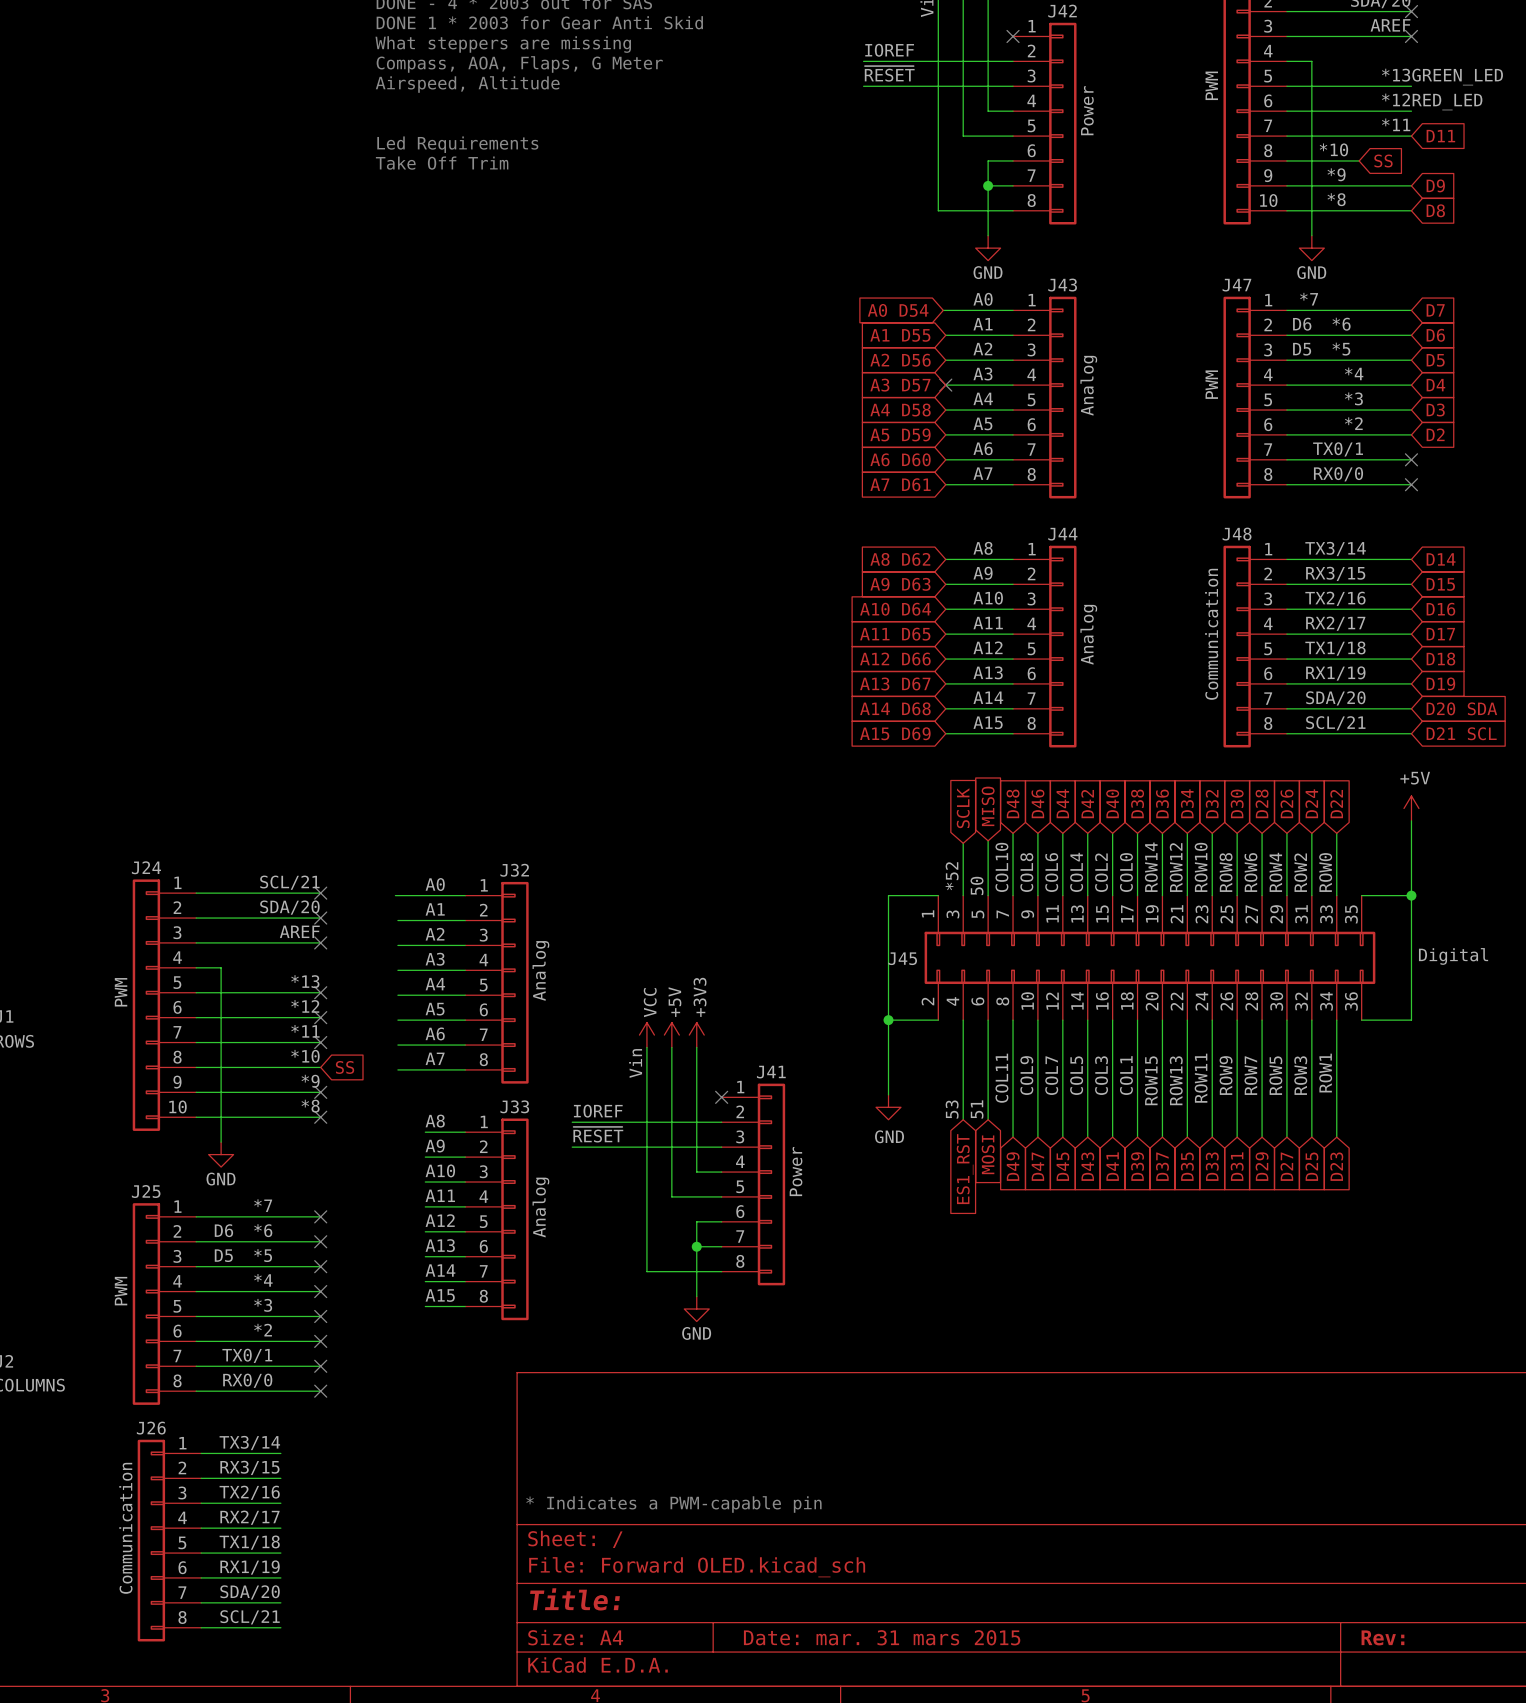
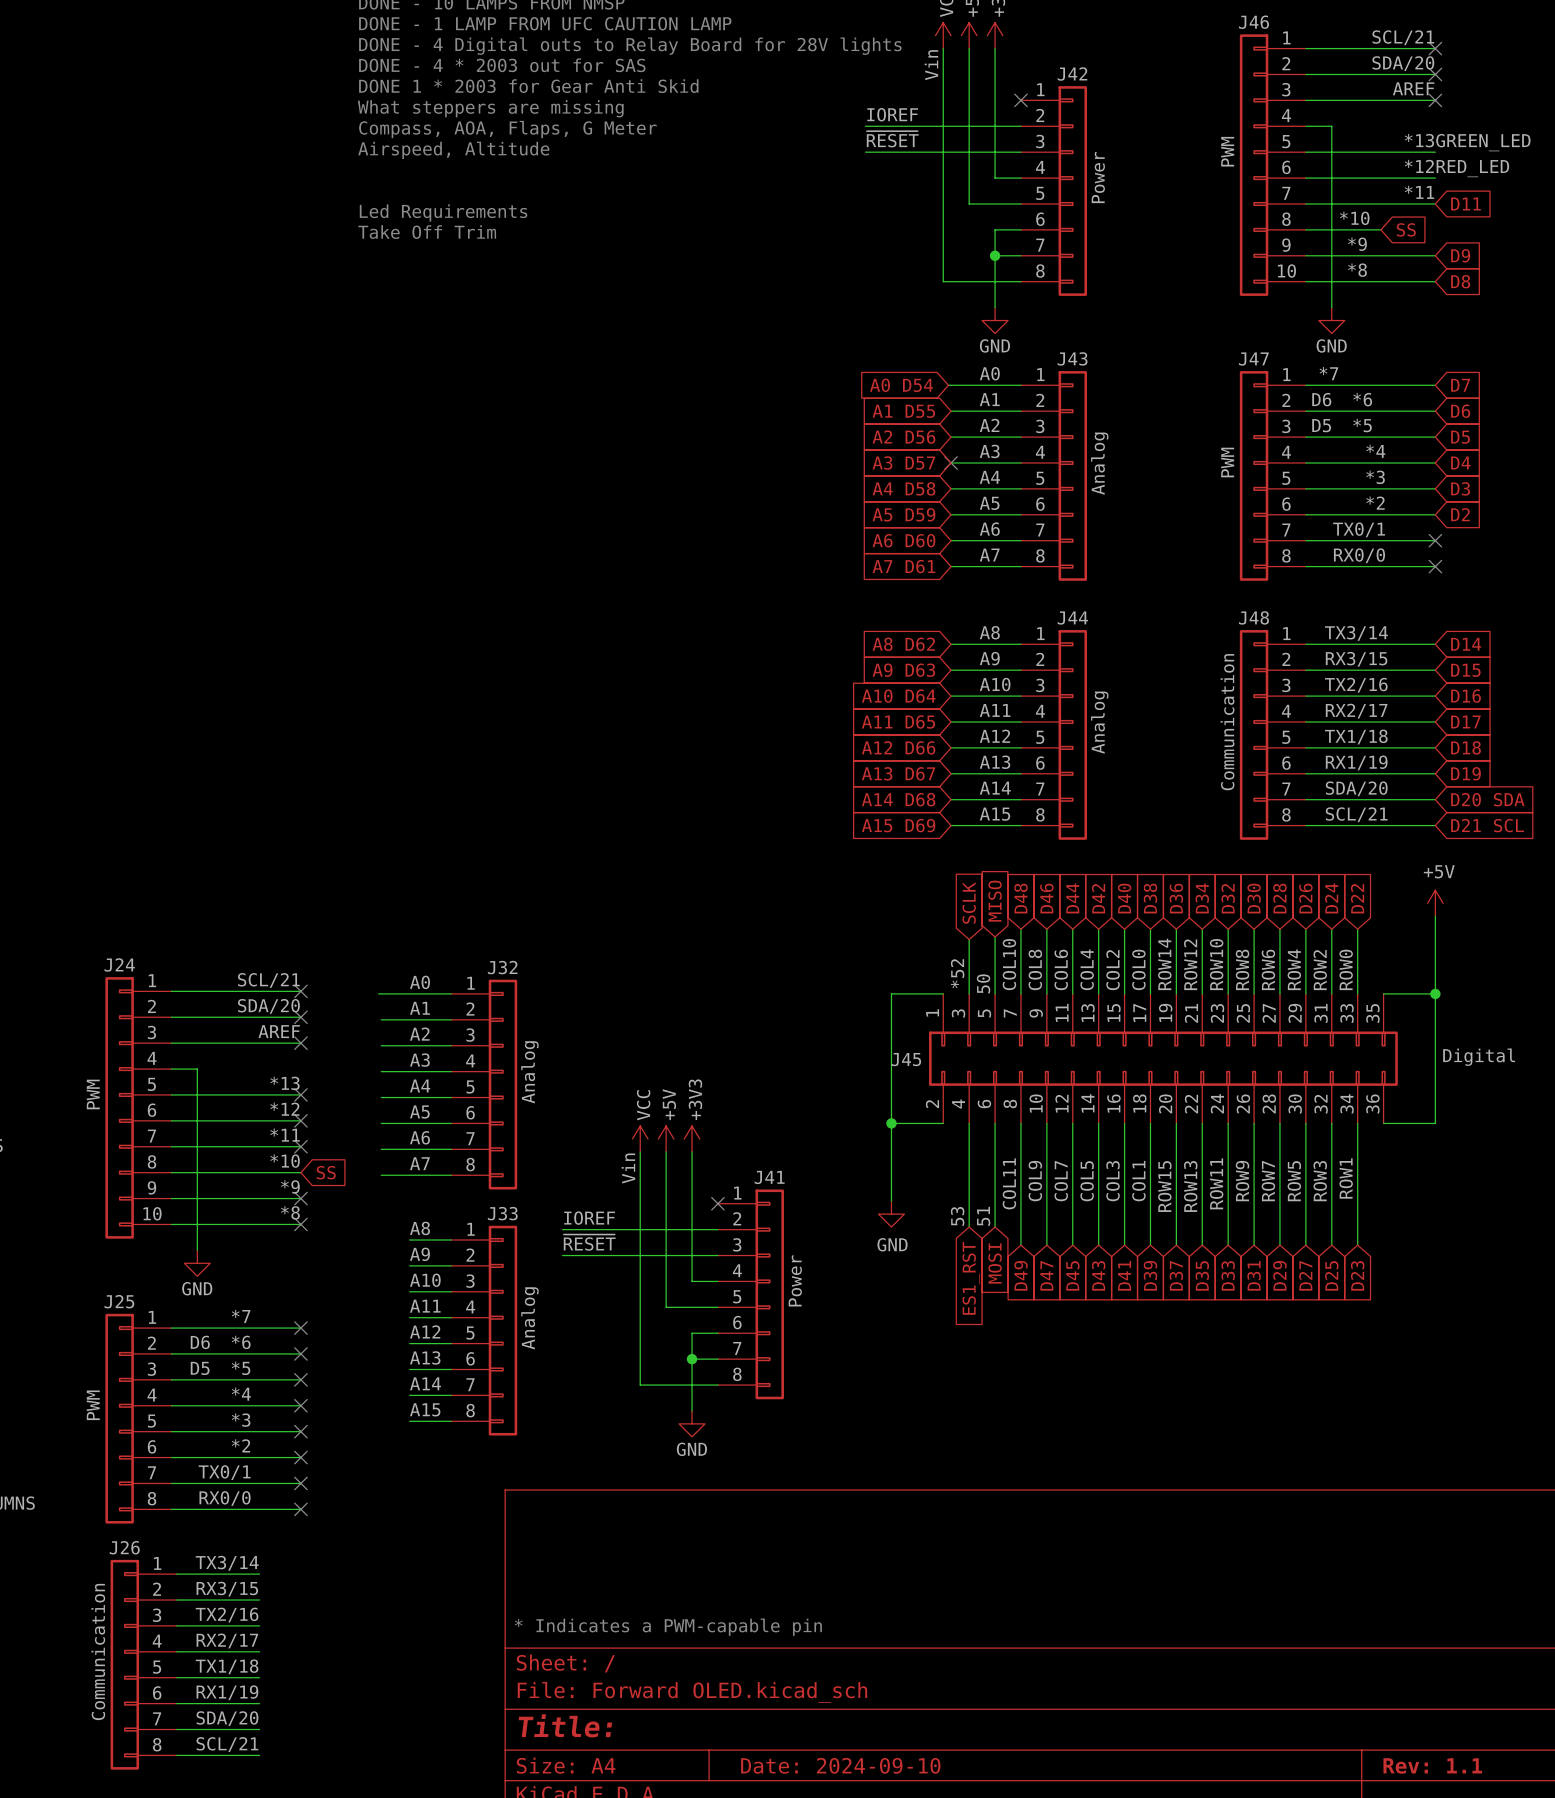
title block: Date: mar. 31 mars 2015 (882, 1637) -> Date: 2024-09-10 (840, 1765)
title block: Rev: (1382, 1637) -> Rev: 1.1 (1432, 1765)

